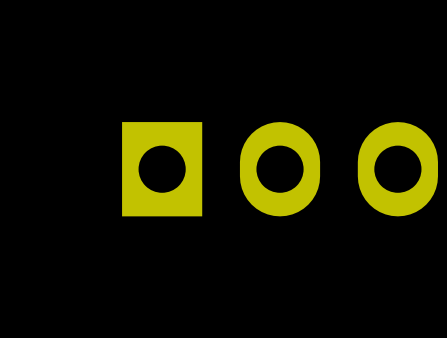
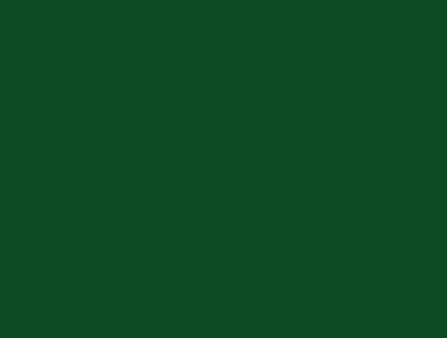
part: (280, 169) -> none

